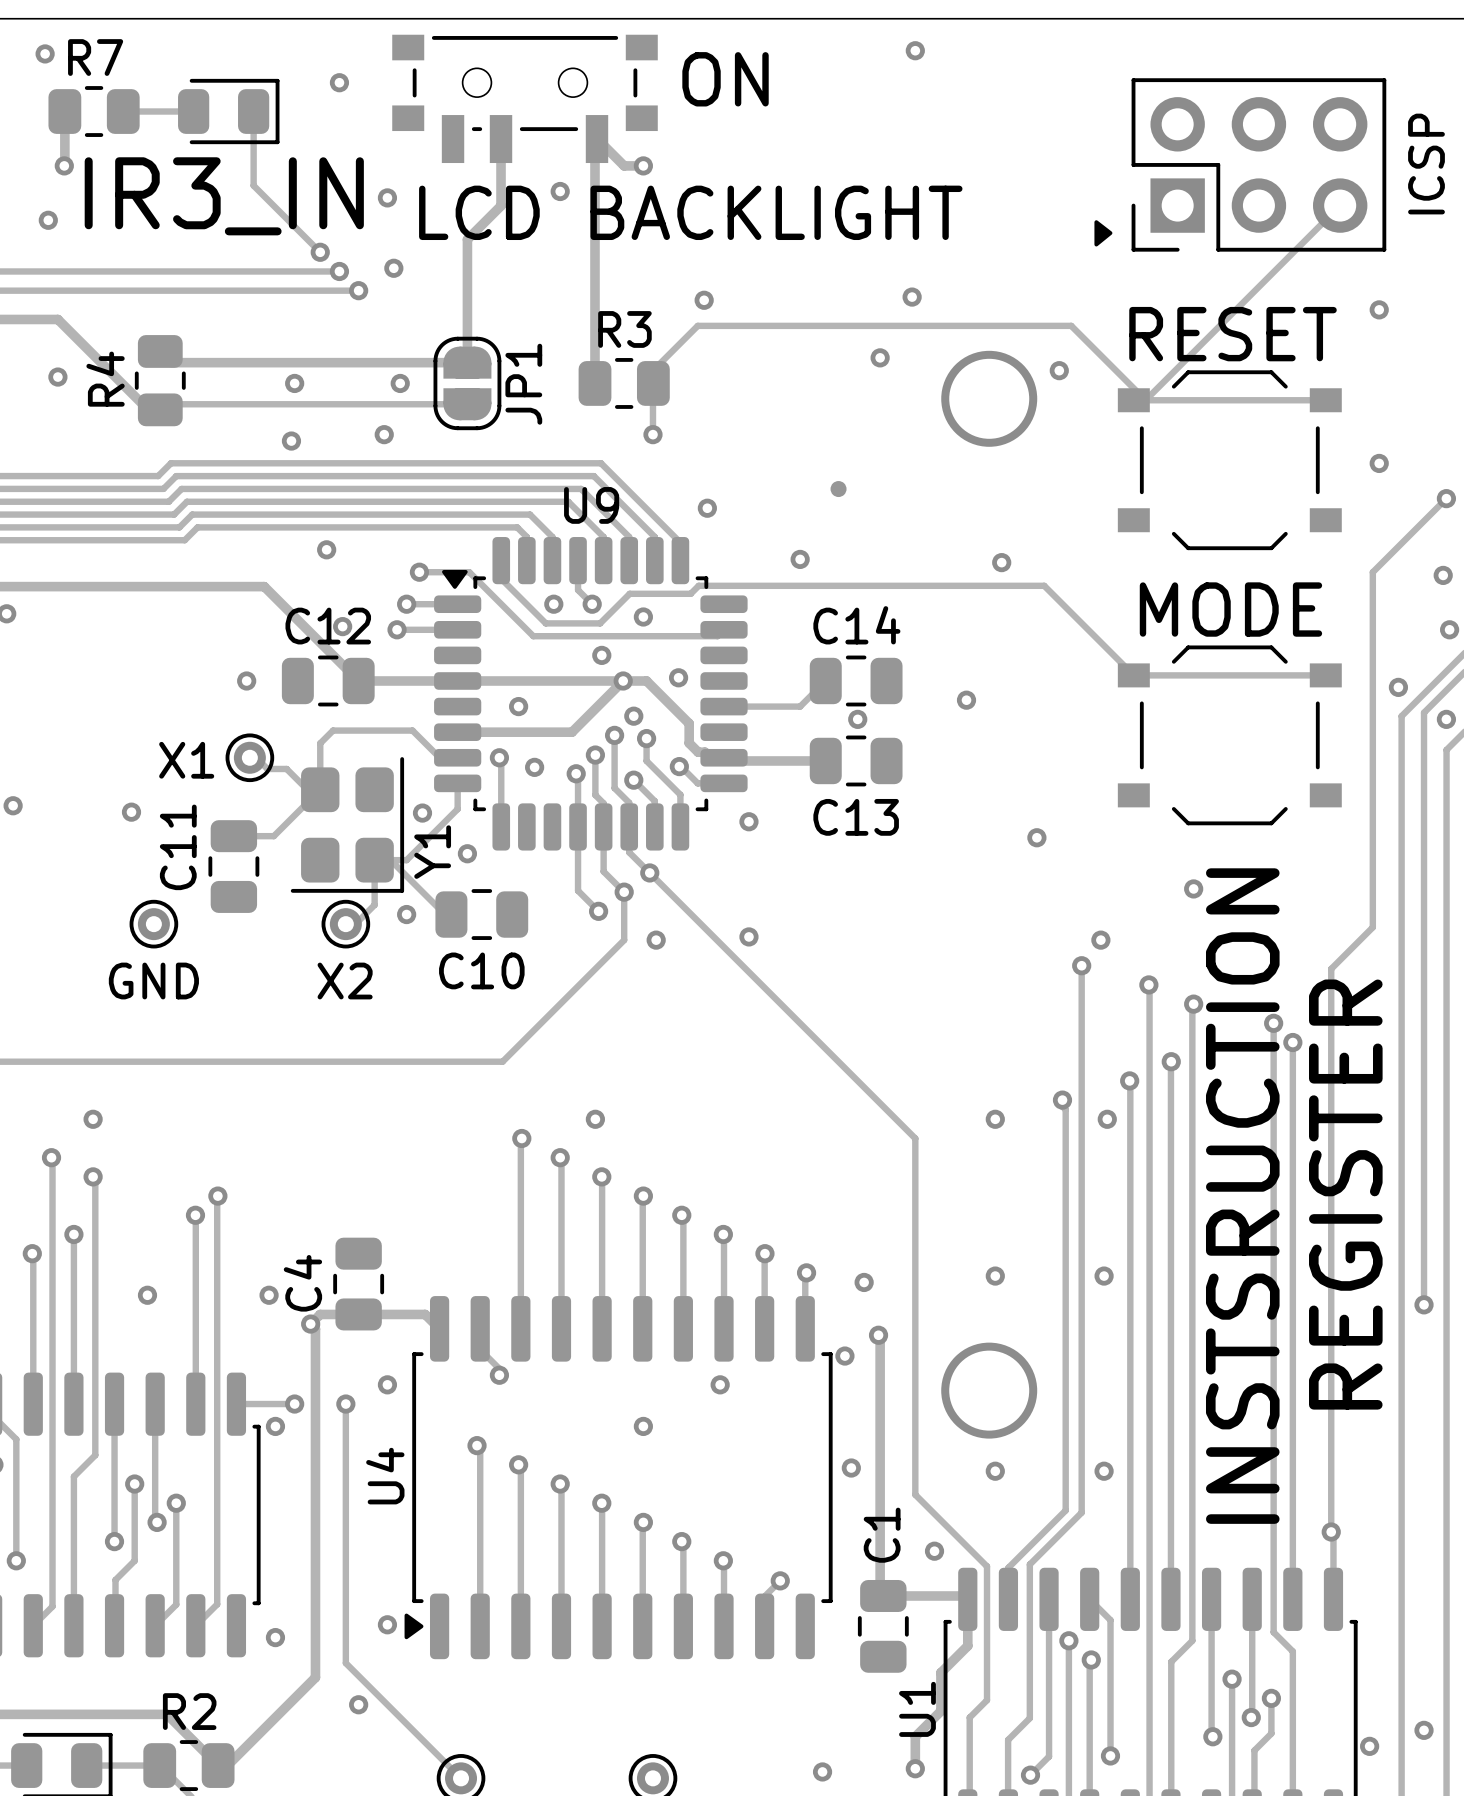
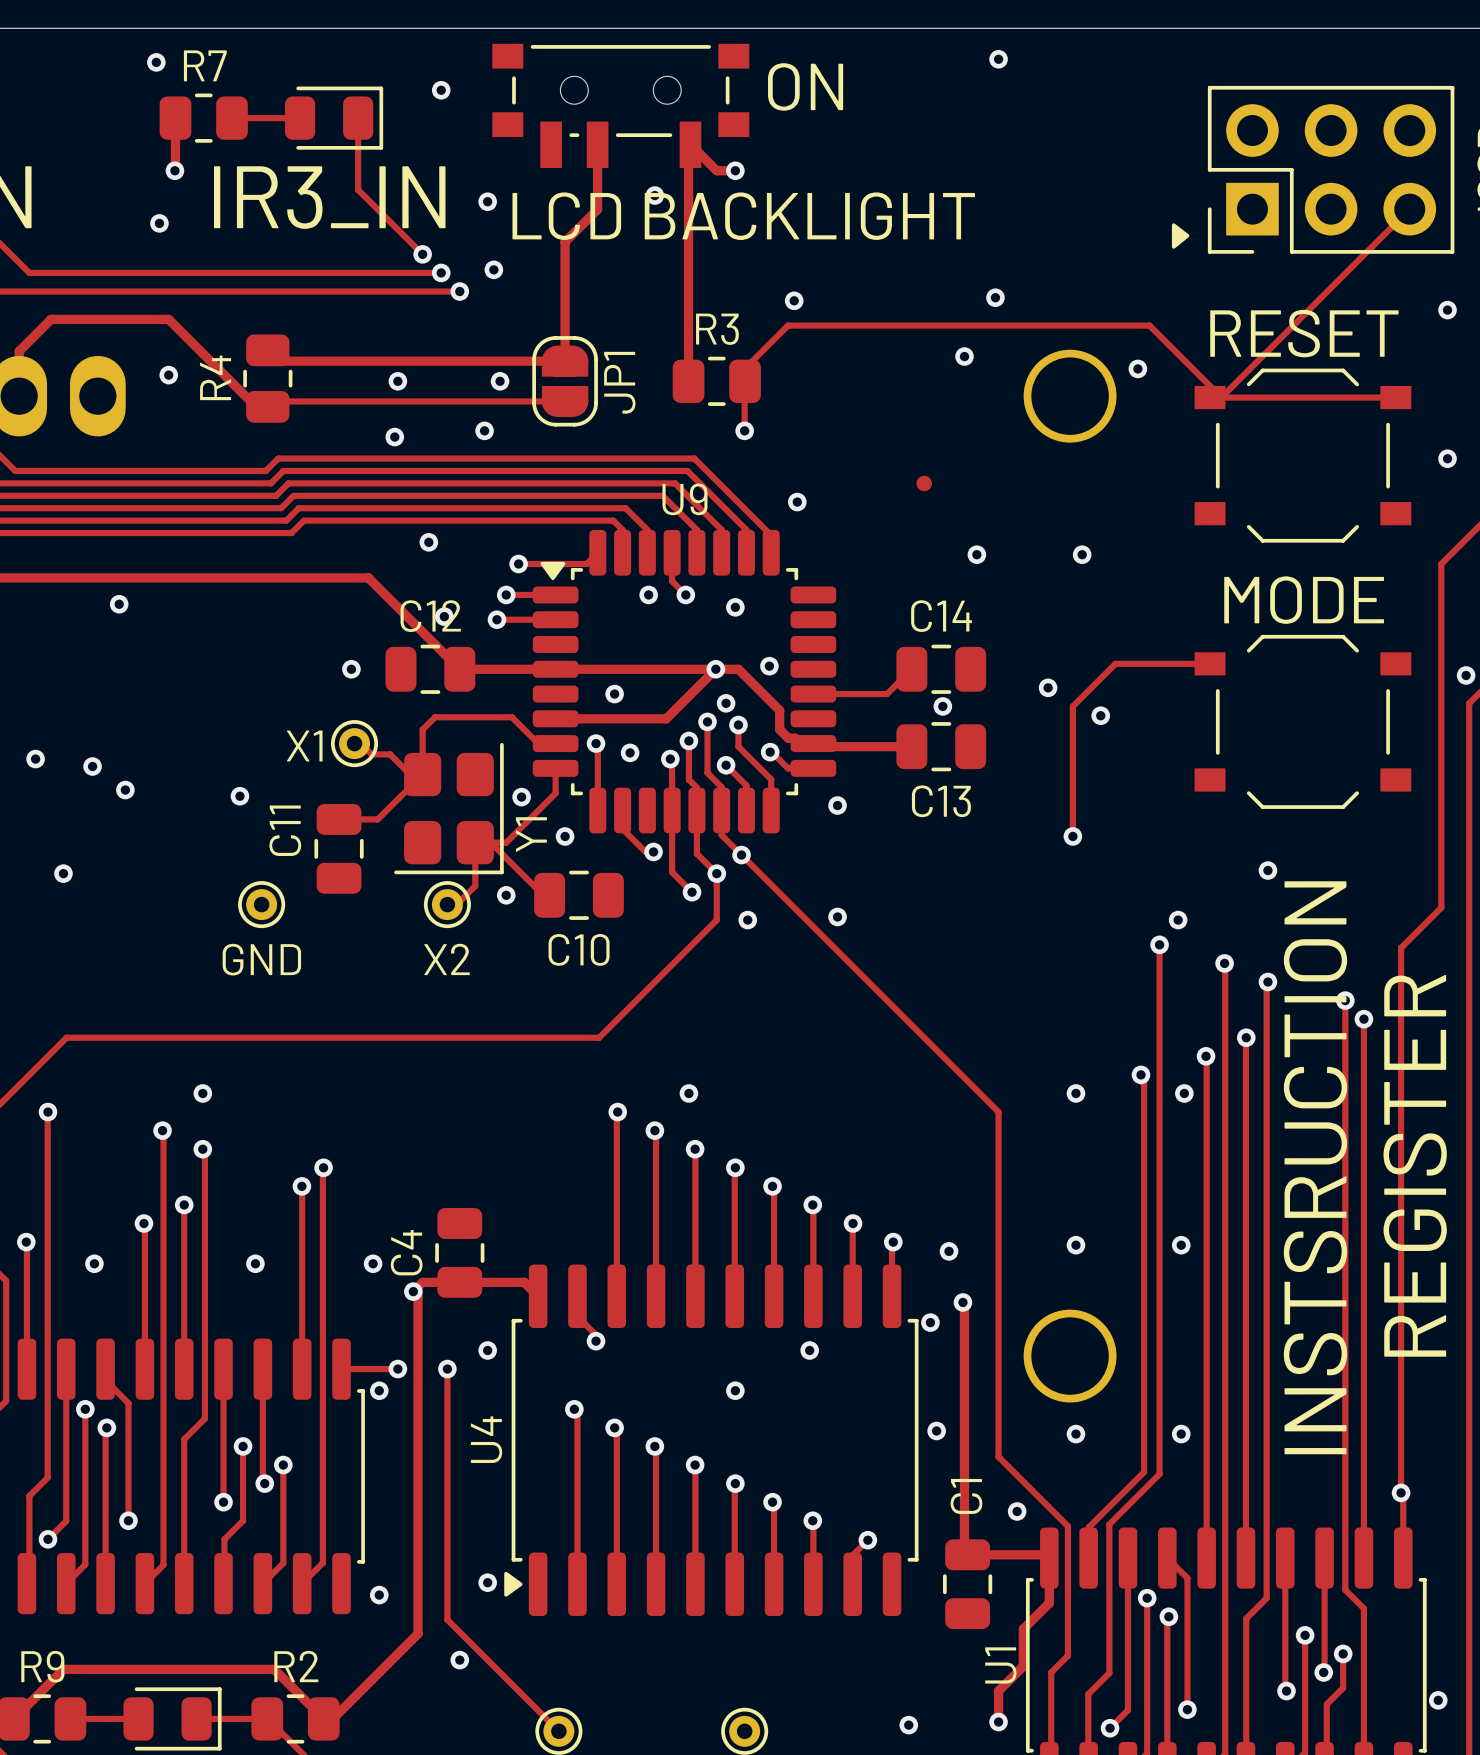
via position: (800, 559) -> (976, 554)
track: (469, 572) (533, 636) (717, 636) (724, 629) -> (566, 564) (586, 564) (597, 552)
track: (501, 578) (545, 623) (600, 623) (629, 593) (690, 593) (698, 585) (1044, 585) (1133, 675) -> (1072, 836) (1072, 706) (1115, 663) (1210, 663)
via: (601, 655) -> none
track: (1146, 675) (1325, 675) -> none
via: none -> (1100, 715)
via position: (1036, 837) -> (1072, 836)
track: none -> (622, 828) (645, 851) (653, 851)
via: none -> (653, 851)

